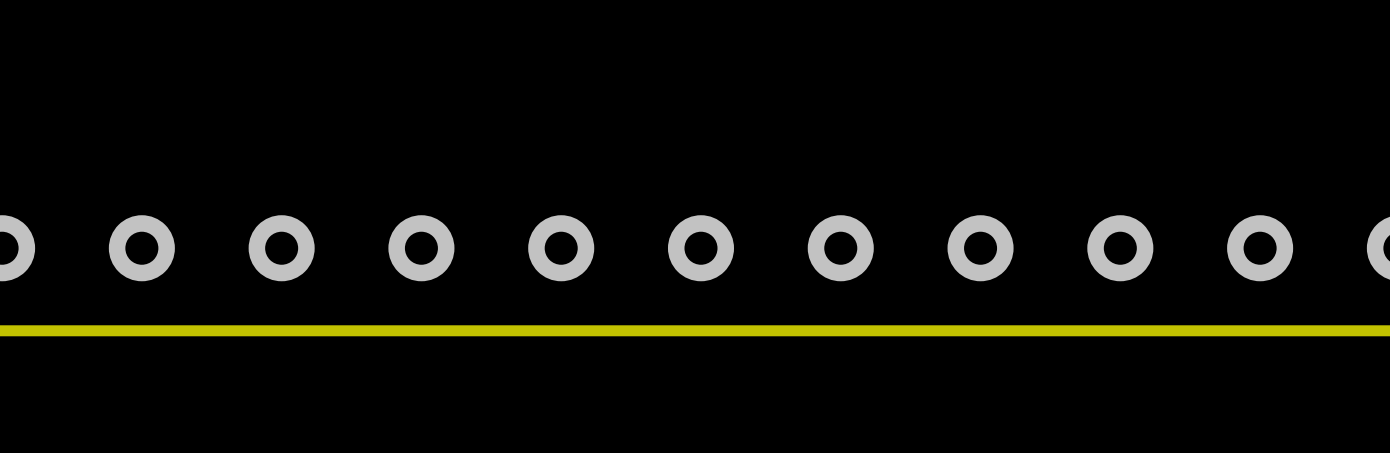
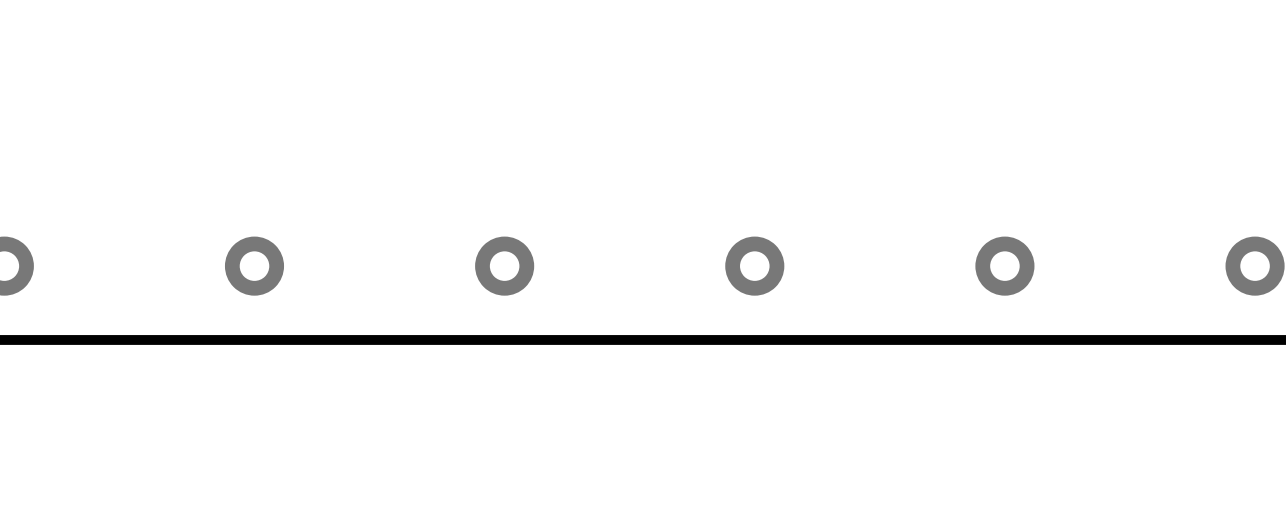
via: (141, 248) -> none
via: (421, 248) -> none
via: (700, 248) -> none
via: (980, 248) -> none
via: (1260, 248) -> none

